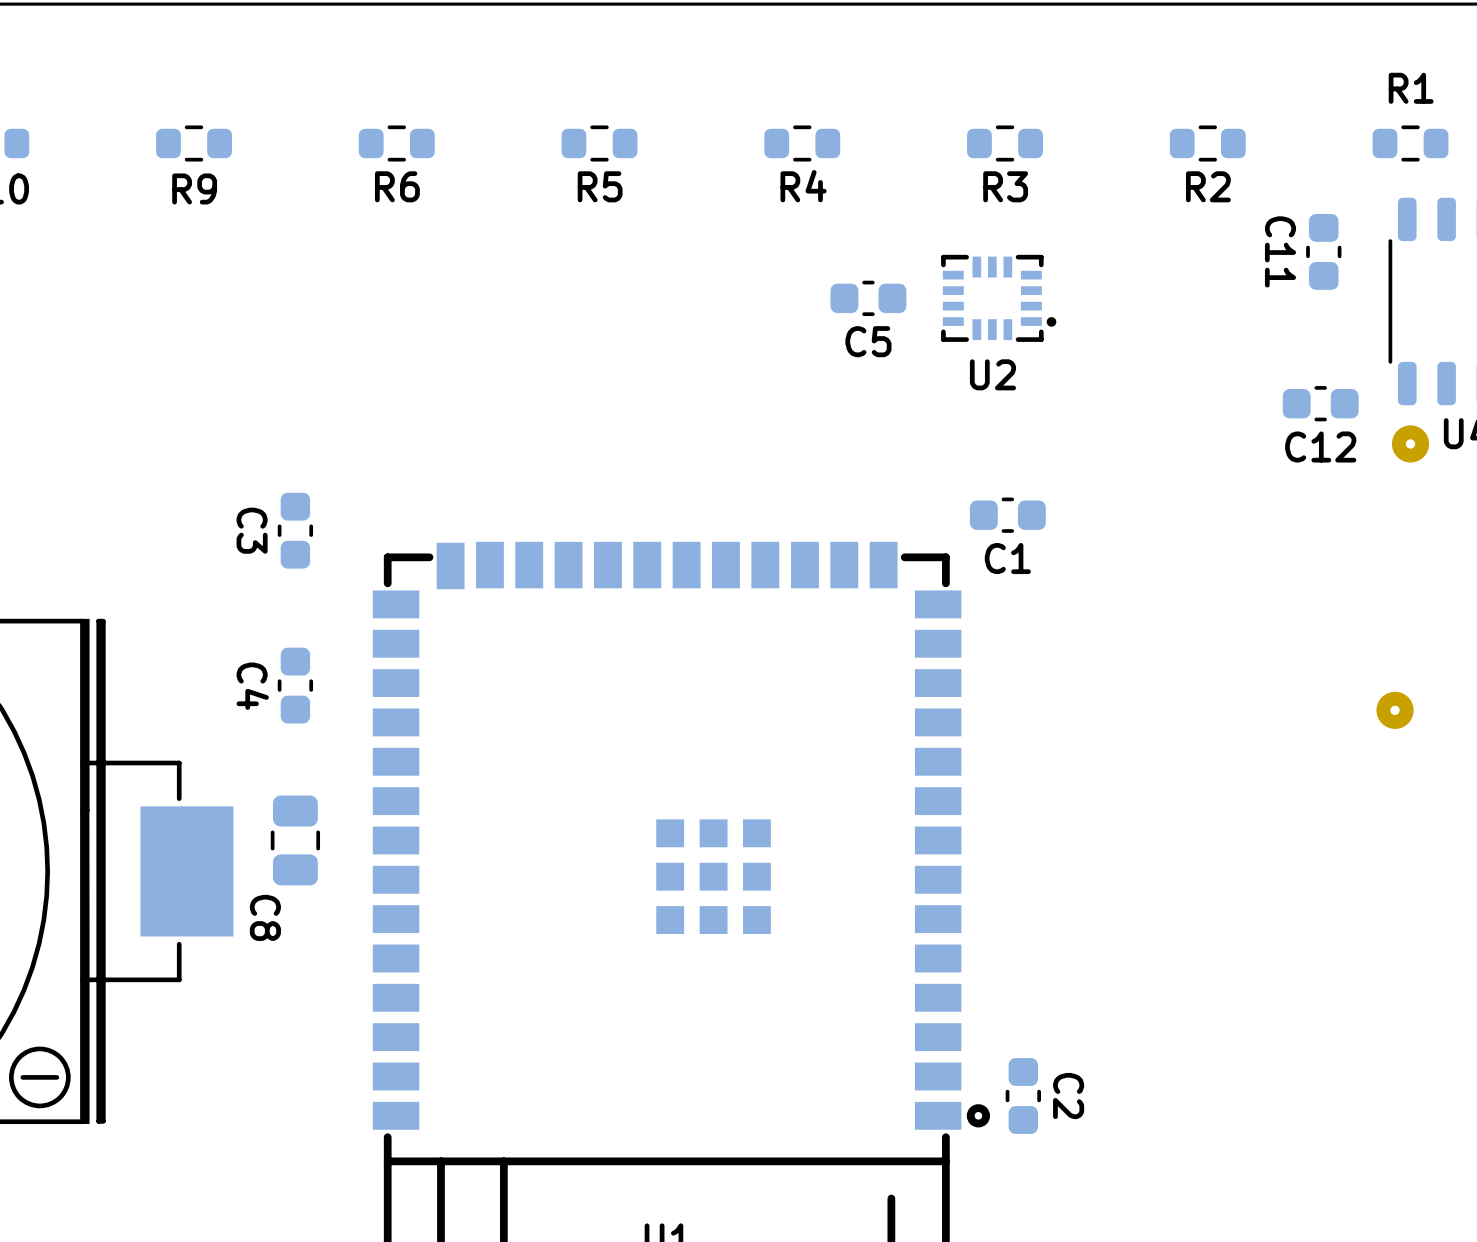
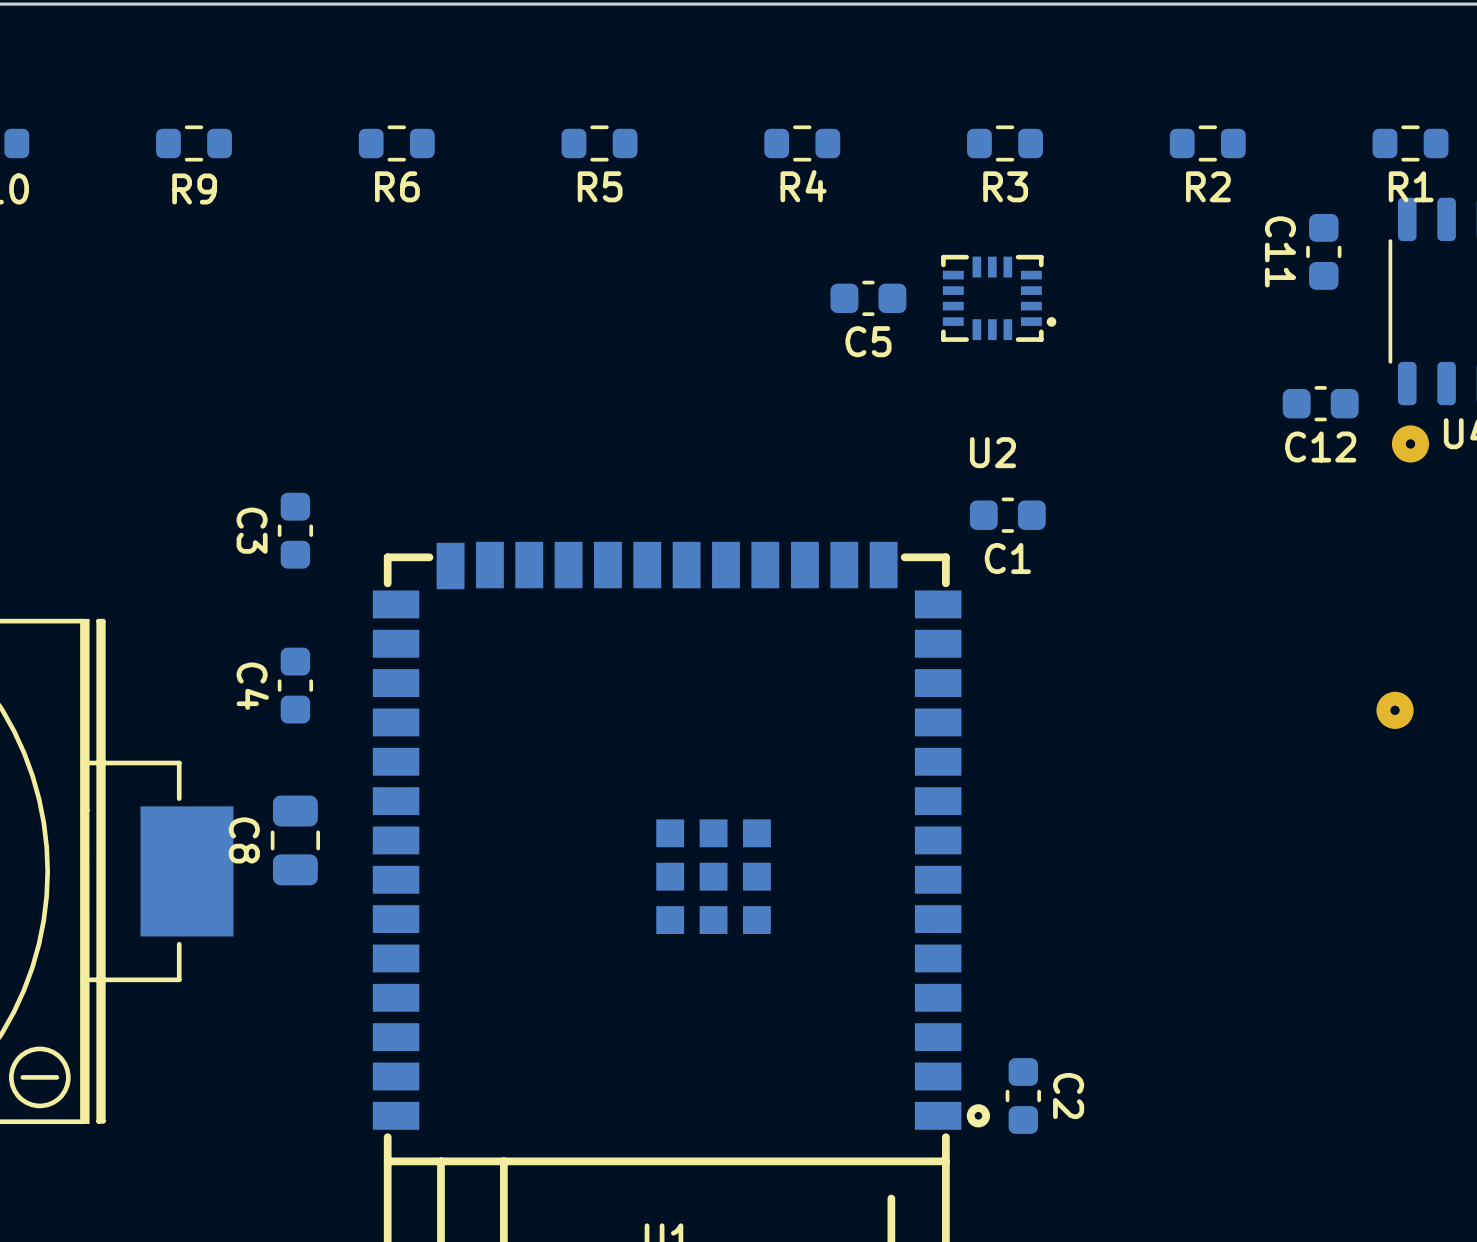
R1 name position: R1 (1411, 88) -> R1 (1411, 186)
U2 name position: U2 (992, 374) -> U2 (992, 452)
C8 name position: C8 (265, 917) -> C8 (244, 840)

